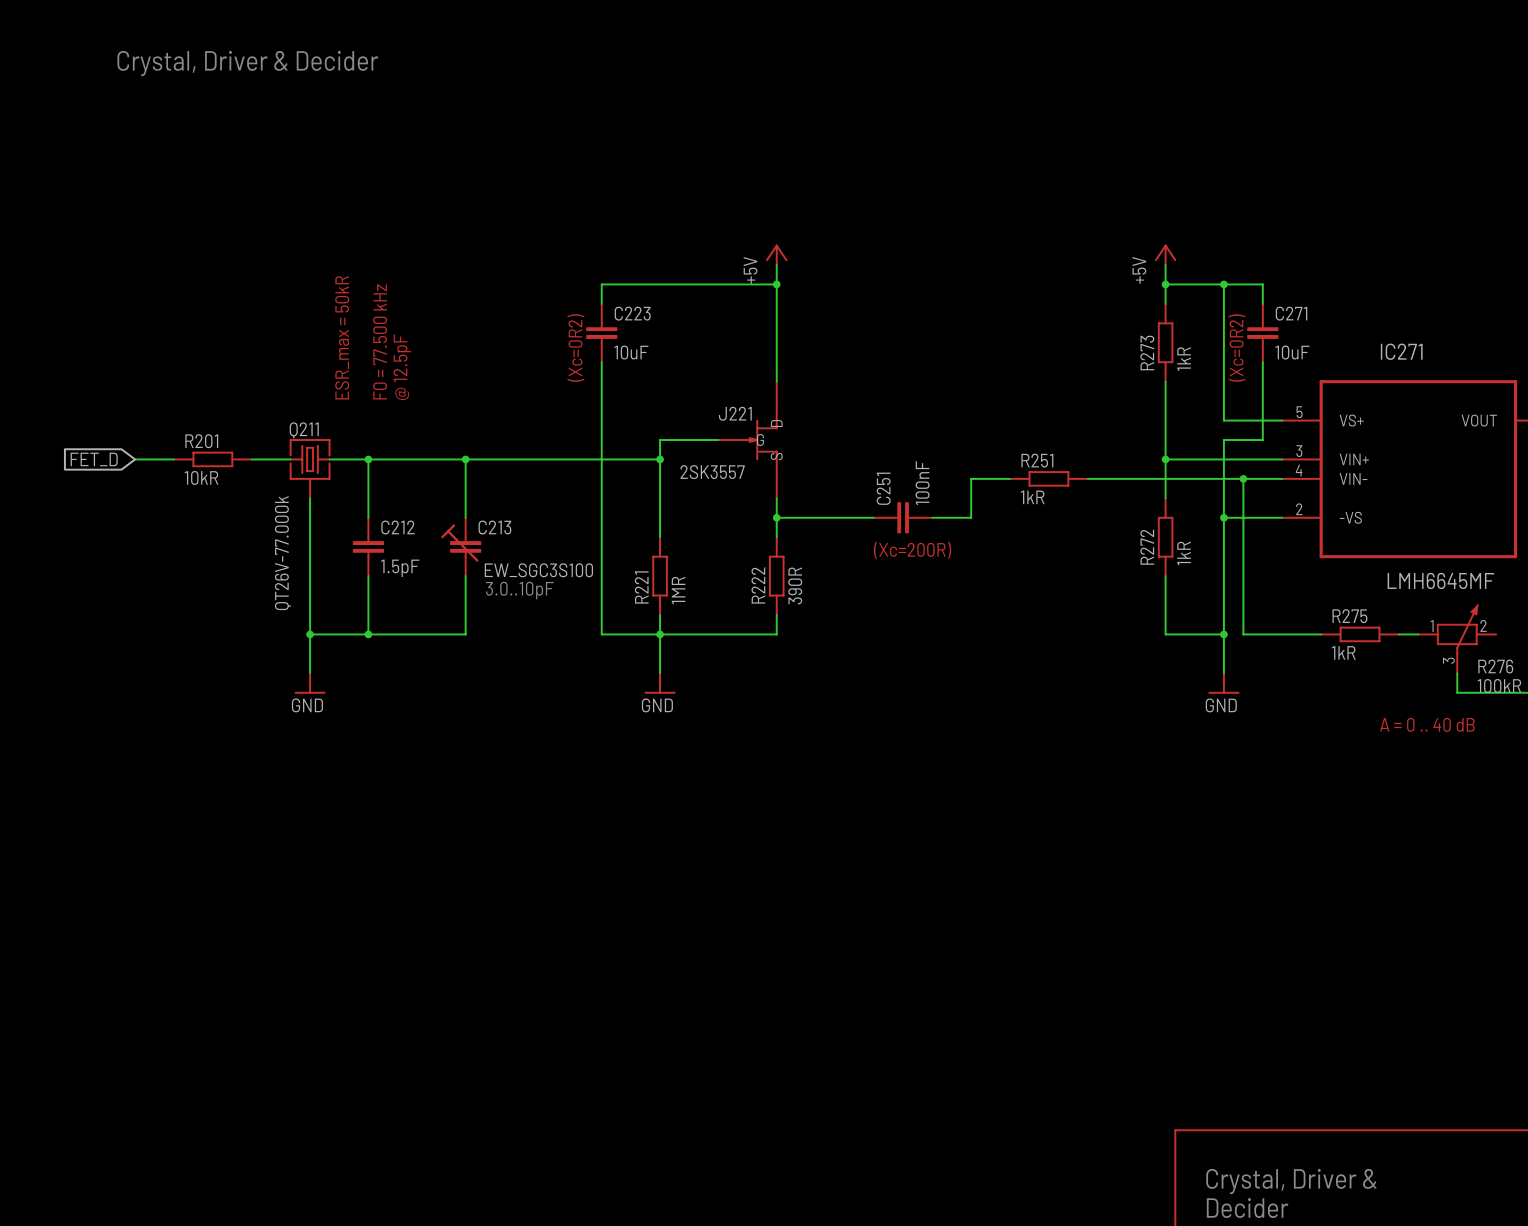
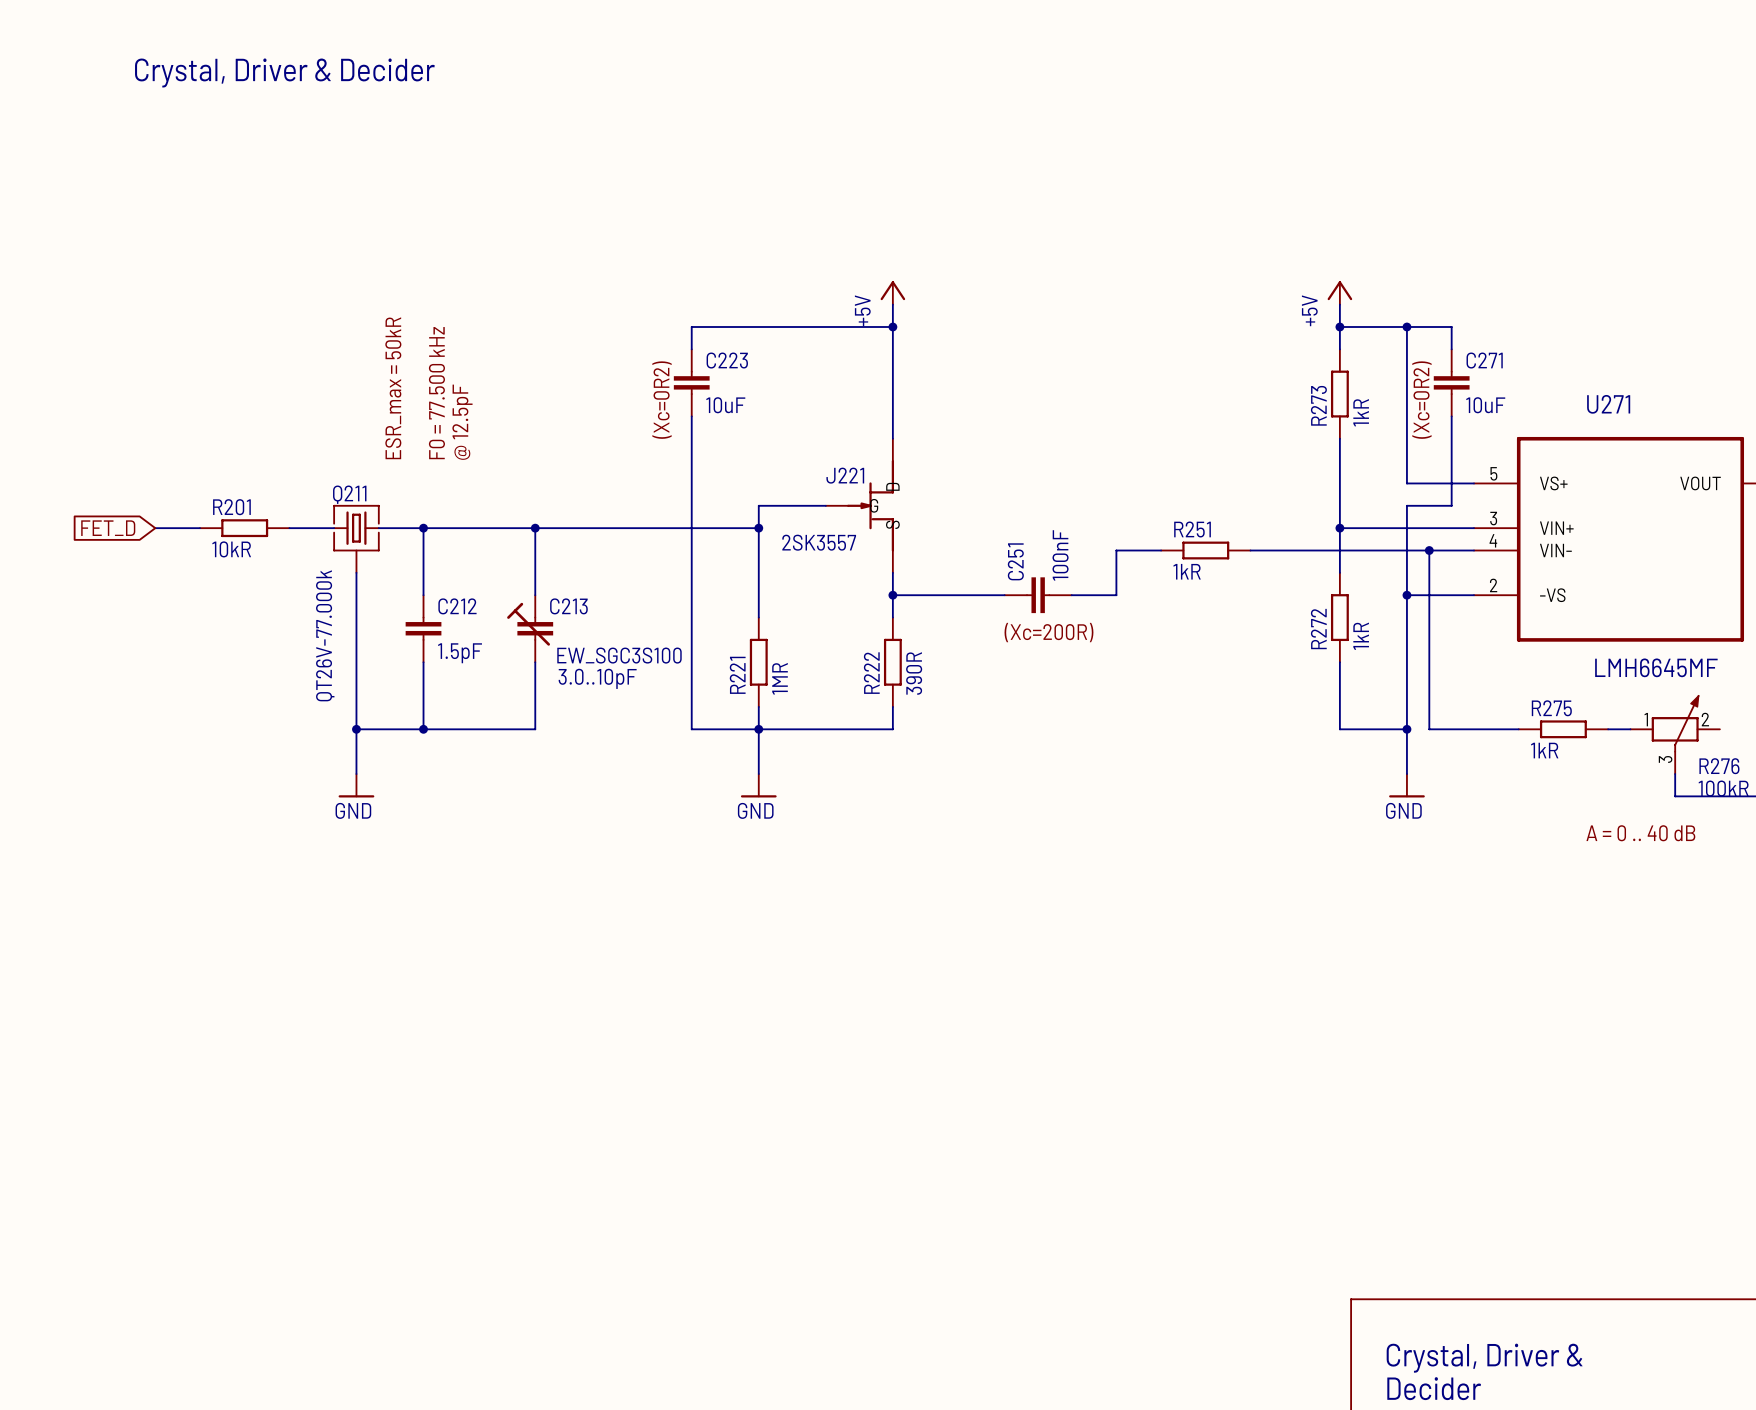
IC271 name: IC271 (1401, 351) -> U271 (1608, 404)

